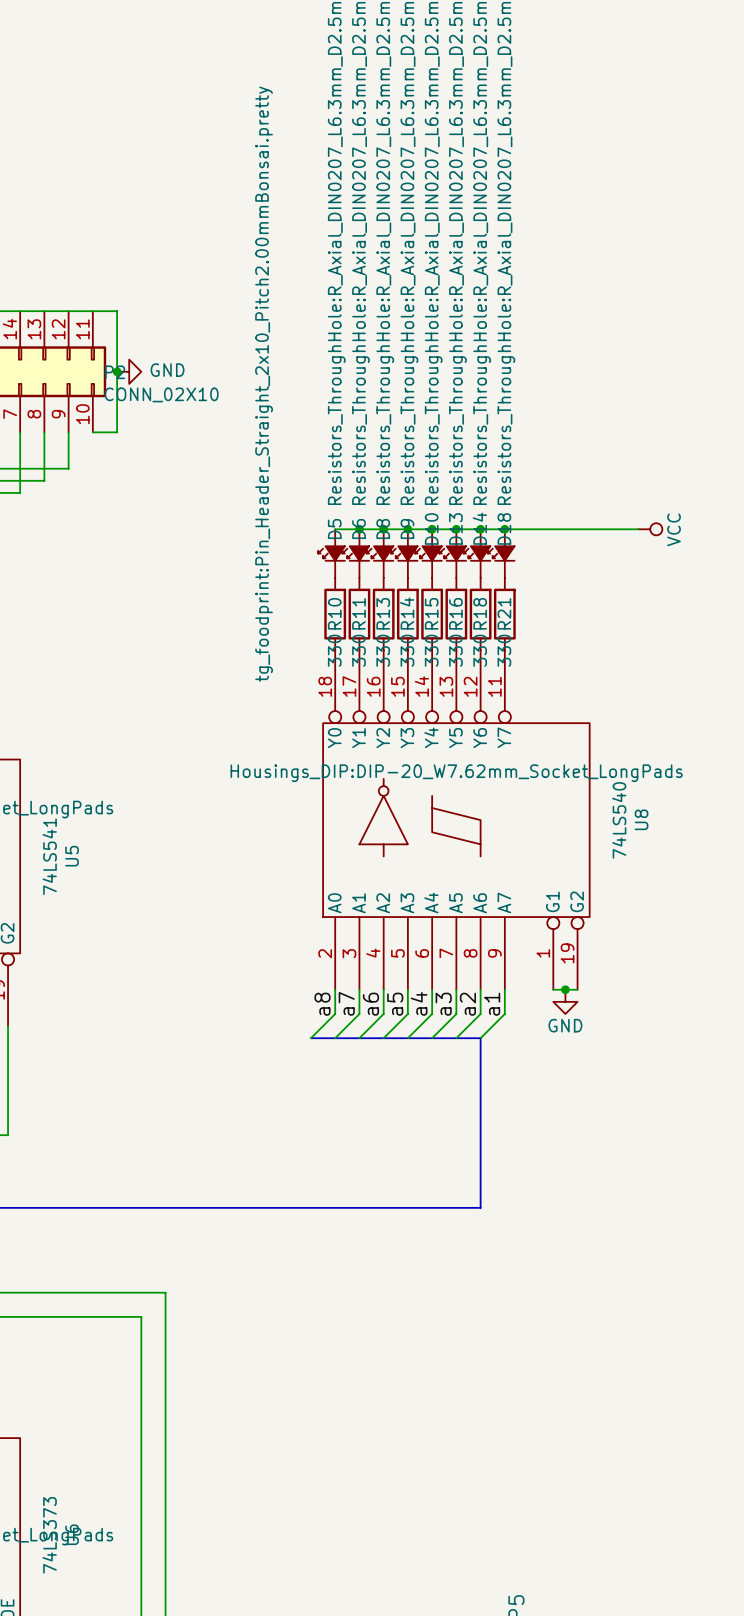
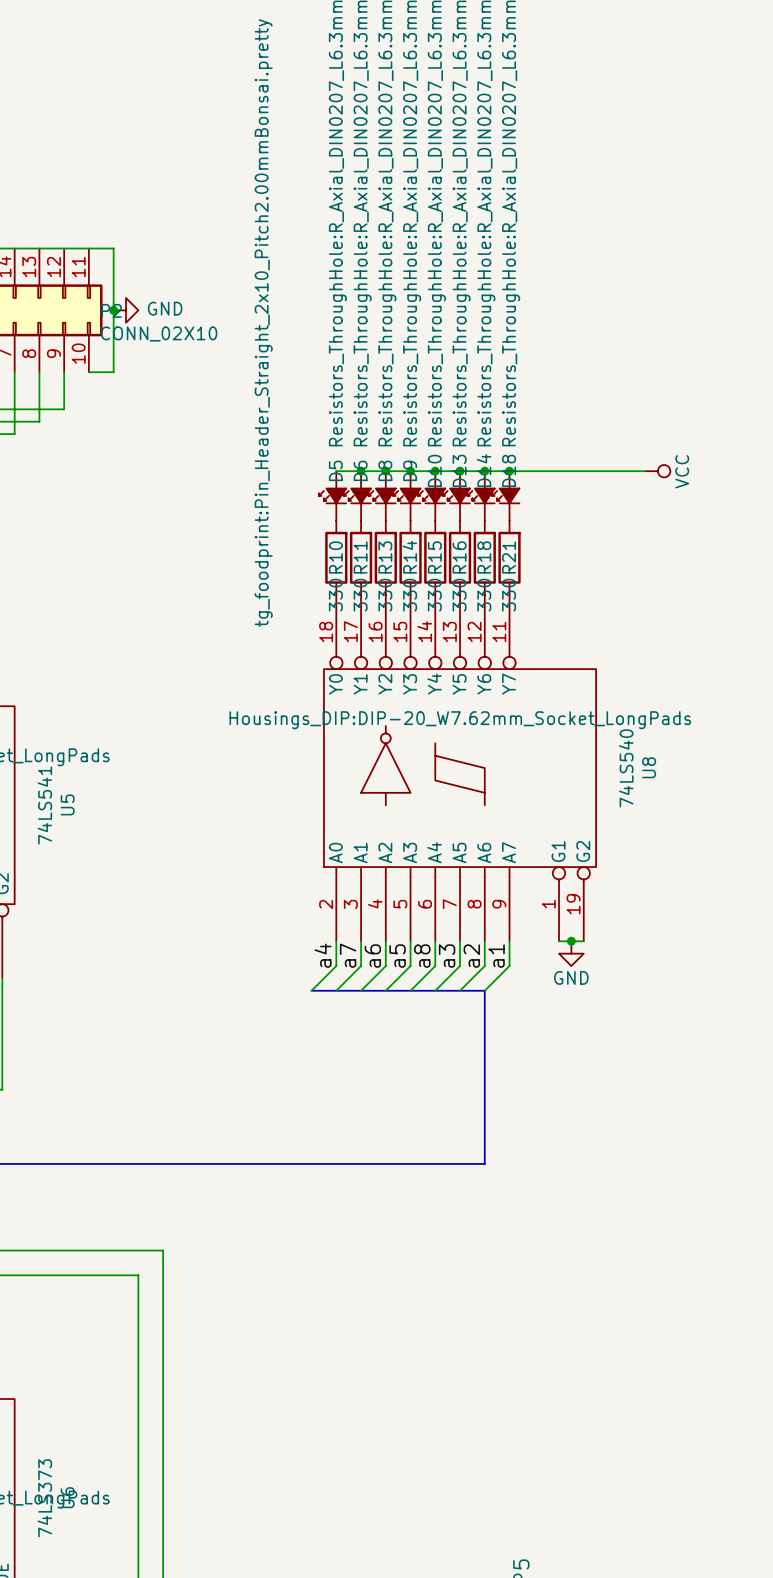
label: a4 (419, 1003) -> a8 (422, 956)
label: a8 (322, 1004) -> a4 (323, 955)

